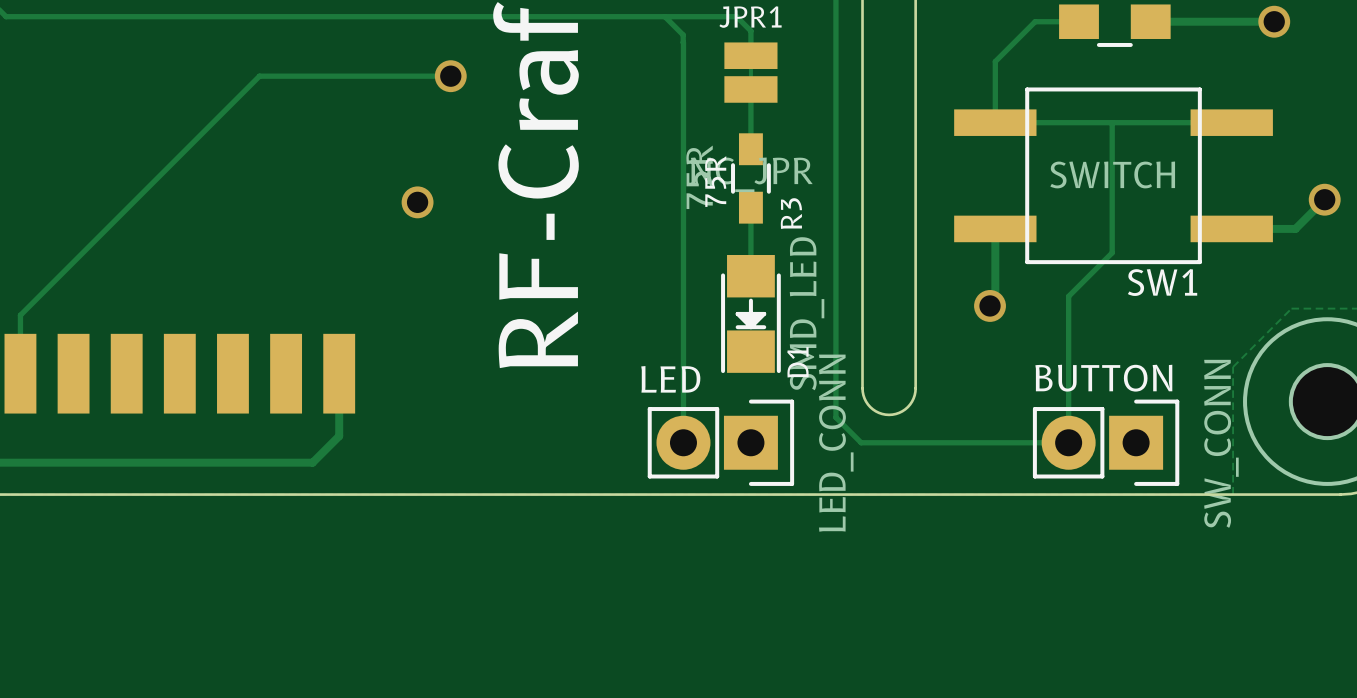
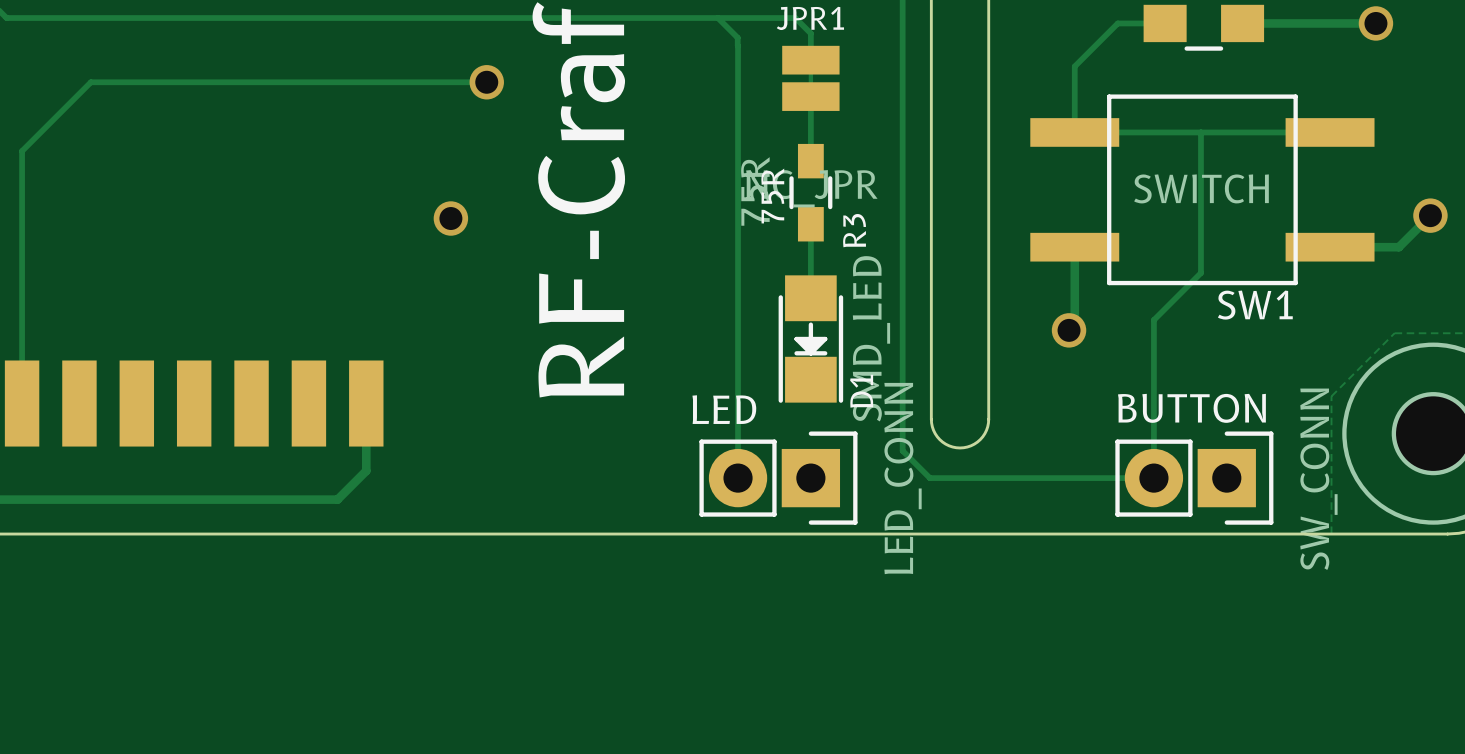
track: (259, 76) (20, 315) -> (280, 82) (90, 82) (22, 151) (22, 340)

